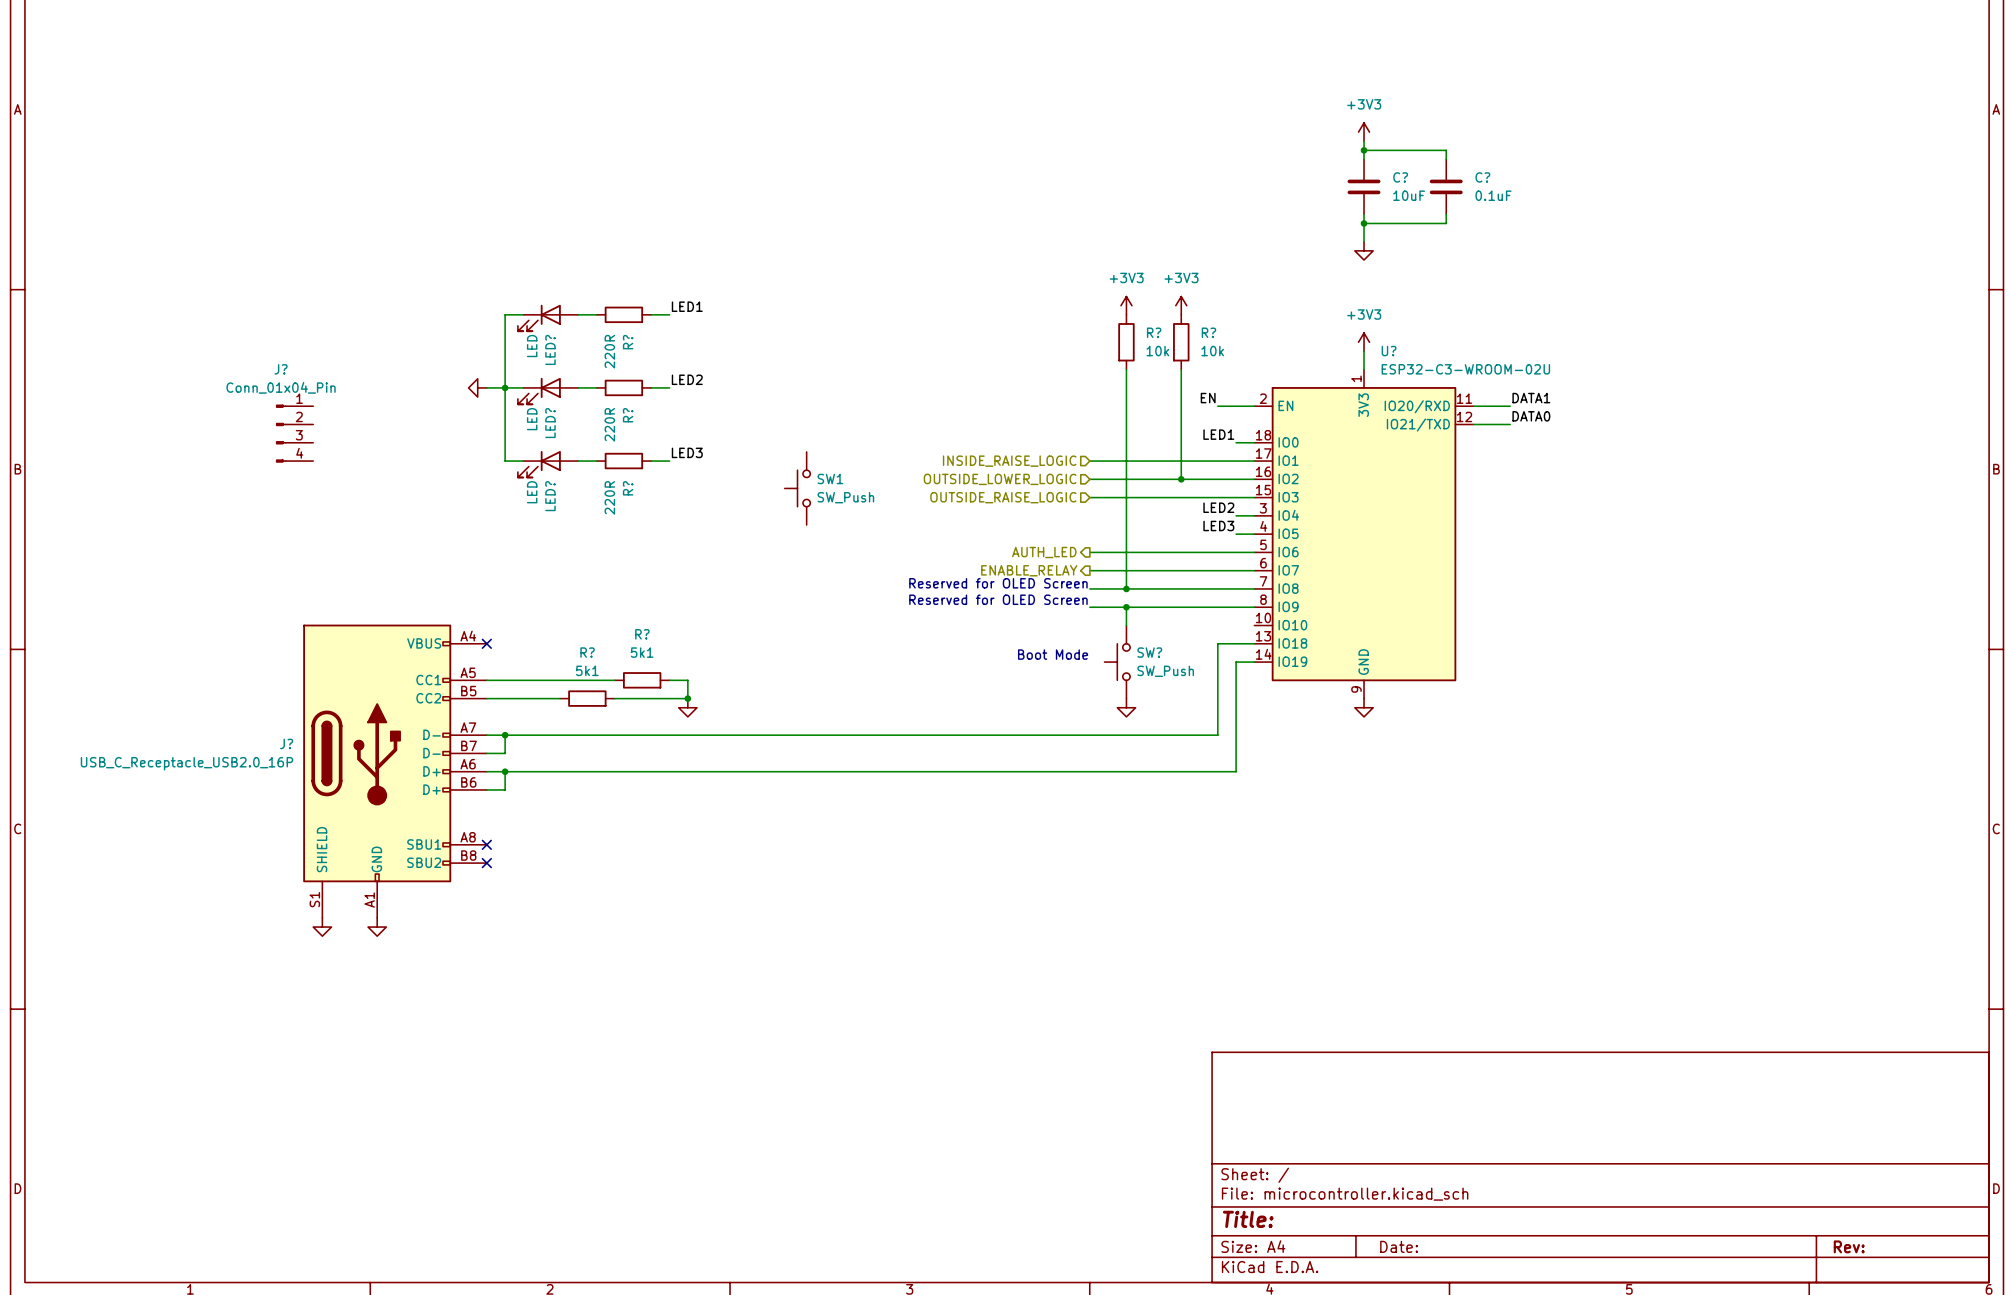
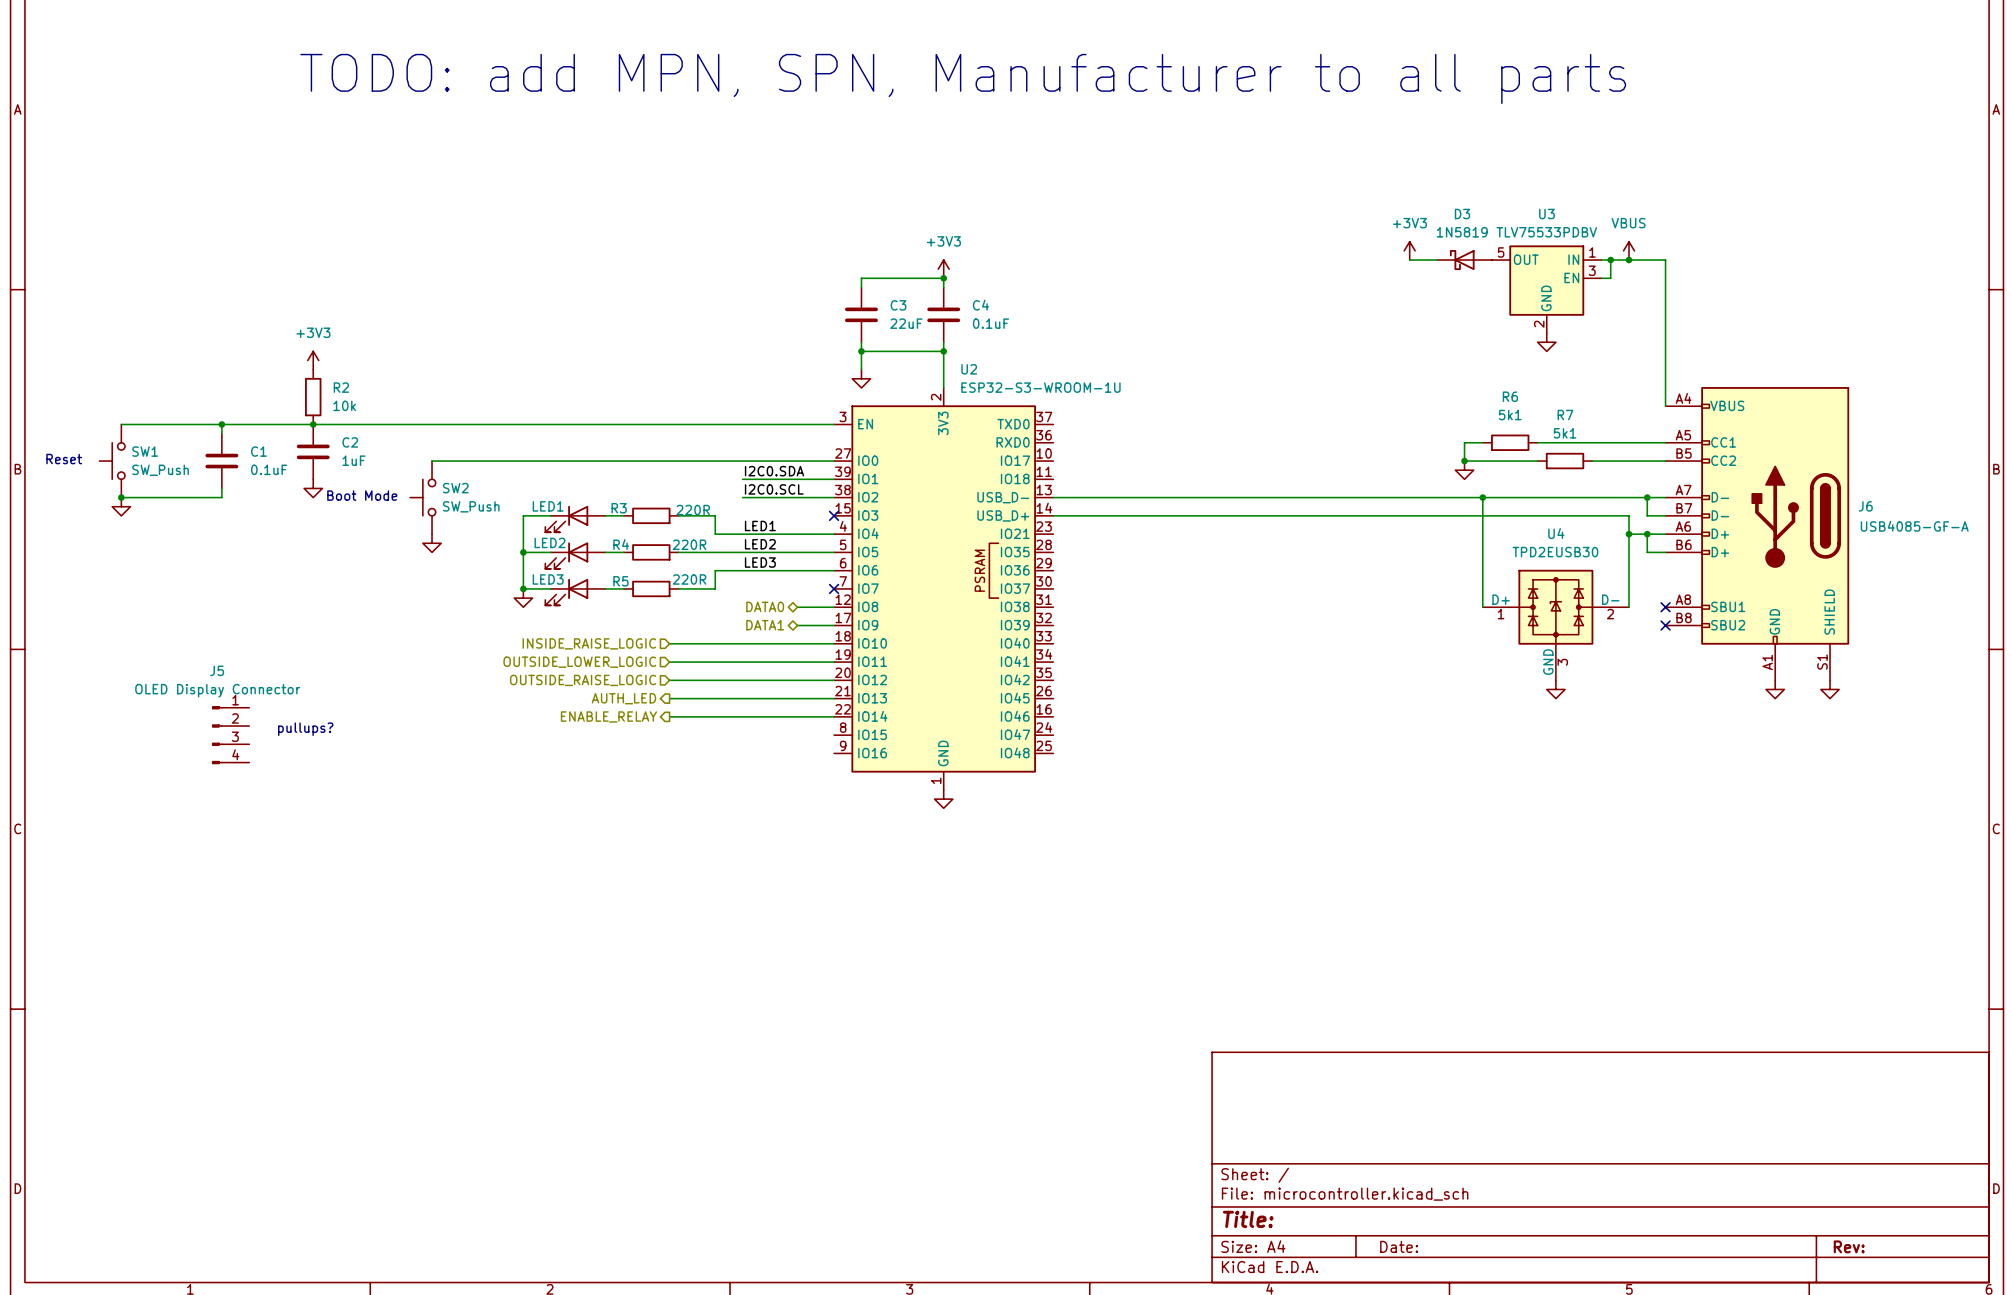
text: none -> TODO: add MPN, SPN, Manufacturer to all parts (963, 78)
power symbol: +3V3 (1364, 132) -> none
wire: (1364, 141) (1364, 159) -> none
wire: (1364, 150) (1446, 150) (1446, 159) -> none
junction: (1364, 150) -> none
C?: 10uF (1364, 186) -> none
C?: 0.1uF (1446, 186) -> none
wire: (1364, 214) (1364, 241) -> none
wire: (1446, 214) (1446, 223) (1364, 223) -> none
junction: (1364, 223) -> none
power symbol: (1364, 250) -> none
power symbol: none -> +3V3 (1409, 250)
power symbol: none -> VBUS (1628, 250)
wire: none -> (1409, 260) (1437, 260)
D3: none -> 1N5819 (1464, 260)
wire: none -> (1601, 260) (1665, 260) (1665, 406)
wire: none -> (1610, 260) (1610, 278) (1601, 278)
junction: none -> (1610, 260)
junction: none -> (1628, 260)
power symbol: none -> +3V3 (943, 269)
junction: none -> (943, 278)
wire: none -> (861, 287) (861, 278) (943, 278) (943, 287)
U3: none -> TLV75533PDBV (1546, 289)
power symbol: +3V3 (1126, 305) -> none
power symbol: +3V3 (1181, 305) -> none
label: LED1 (687, 306) -> none
wire: (523, 314) (505, 314) (505, 461) -> (432, 461) (505, 461)
wire: (578, 314) (596, 314) -> none
R?: 220R (623, 314) -> none
wire: (651, 314) (669, 314) -> none
C3: none -> 22uF (861, 314)
C4: none -> 0.1uF (943, 314)
LED?: LED (548, 318) -> none
wire: none -> (861, 342) (861, 369)
wire: none -> (943, 342) (943, 387)
R?: 10k (1126, 342) -> none
R?: 10k (1181, 342) -> none
power symbol: +3V3 (1364, 342) -> none
power symbol: none -> (1546, 342)
wire: none -> (861, 351) (943, 351)
junction: none -> (861, 351)
junction: none -> (943, 351)
wire: (1364, 351) (1364, 369) -> none
power symbol: none -> +3V3 (313, 360)
wire: (1126, 369) (1126, 588) -> none
wire: (1181, 369) (1181, 479) -> none
power symbol: none -> (861, 378)
label: LED2 (687, 379) -> none
power symbol: (477, 387) -> none
wire: (486, 387) (523, 387) -> none
junction: (505, 387) -> none
wire: (578, 387) (596, 387) -> (605, 515) (623, 515)
R?: 220R (623, 387) -> none
wire: (651, 387) (669, 387) -> (605, 552) (623, 552)
LED?: LED (548, 391) -> none
R2: none -> 10k (313, 397)
label: EN (1208, 398) -> none
label: DATA1 (1531, 398) -> none
wire: (1217, 406) (1254, 406) -> none
wire: (1473, 406) (1510, 406) -> none
label: DATA0 (1531, 416) -> none
wire: none -> (121, 424) (834, 424)
wire: none -> (221, 424) (221, 433)
junction: none -> (221, 424)
junction: none -> (313, 424)
wire: (1473, 424) (1510, 424) -> none
J?: Conn_01x04_Pin (294, 433) -> none
label: LED1 (1218, 434) -> none
wire: (1236, 442) (1254, 442) -> none
wire: none -> (1482, 442) (1464, 442) (1464, 461) (1537, 461)
R6: none -> 5k1 (1510, 442)
wire: none -> (1537, 442) (1665, 442)
C2: none -> 1uF (313, 451)
label position: LED3 (687, 452) -> LED3 (760, 562)
text: none -> Reset (64, 459)
C1: none -> 0.1uF (221, 461)
wire: none -> (596, 461) (651, 461)
R?: 220R (623, 461) -> none
wire: none -> (669, 461) (834, 461)
hierarchical label: INSIDE_RAISE_LOGIC (1009, 461) -> none
wire: (1089, 461) (1254, 461) -> none
junction: none -> (1464, 461)
R7: none -> 5k1 (1565, 461)
wire: none -> (1592, 461) (1665, 461)
LED?: LED (548, 464) -> none
power symbol: none -> (1464, 470)
label: none -> I2C0.SDA (774, 471)
wire: none -> (742, 479) (834, 479)
hierarchical label: OUTSIDE_LOWER_LOGIC (1000, 479) -> none
wire: (1089, 479) (1254, 479) -> none
junction: (1181, 479) -> none
wire: none -> (221, 488) (221, 497) (121, 497)
power symbol: none -> (313, 488)
SW1 position: (797, 488) -> (112, 461)
label: none -> I2C0.SCL (774, 489)
text: none -> Boot Mode (362, 495)
junction: none -> (121, 497)
SW2: none -> SW_Push (422, 497)
wire: none -> (742, 497) (834, 497)
hierarchical label: OUTSIDE_RAISE_LOGIC (1003, 497) -> none
wire: none -> (1053, 497) (1089, 497)
wire: none -> (1254, 497) (1665, 497)
wire: none -> (1482, 497) (1482, 607)
junction: none -> (1482, 497)
wire: none -> (1647, 497) (1647, 515) (1665, 515)
junction: none -> (1647, 497)
power symbol: none -> (121, 506)
label: LED2 (1218, 507) -> none
wire: none -> (550, 515) (523, 515) (523, 588) (550, 588)
R3: none -> 220R (651, 515)
wire: none -> (678, 515) (715, 515) (715, 534) (834, 534)
no-connect mark: none -> (834, 515)
wire: none -> (1053, 515) (1236, 515)
wire: none -> (1254, 515) (1628, 515) (1628, 607)
LED1: none -> (575, 519)
label: none -> LED1 (760, 525)
label: LED3 (1218, 525) -> none
J6: none -> (1757, 533)
wire: (1236, 534) (1254, 534) -> none
U?: ESP32-C3-WROOM-02U (1364, 534) -> none
wire: none -> (1628, 534) (1665, 534)
junction: none -> (1628, 534)
wire: none -> (1647, 534) (1647, 552) (1665, 552)
junction: none -> (1647, 534)
power symbol: none -> (432, 543)
label: none -> LED2 (760, 544)
wire: none -> (523, 552) (550, 552)
junction: none -> (523, 552)
R4: none -> 220R (651, 552)
wire: none -> (678, 552) (834, 552)
hierarchical label: AUTH_LED (1044, 552) -> none
wire: (1089, 552) (1254, 552) -> none
LED2: none -> (575, 555)
wire: none -> (834, 570) (715, 570) (715, 588) (678, 588)
hierarchical label: ENABLE_RELAY (1029, 570) -> none
wire: (1089, 570) (1254, 570) -> none
text: Reserved for OLED Screen (998, 583) -> none
junction: none -> (523, 588)
wire: none -> (605, 588) (623, 588)
R5: none -> 220R (651, 588)
no-connect mark: none -> (834, 588)
U2: none -> ESP32-S3-WROOM-1U (943, 588)
wire: (1089, 588) (1254, 588) -> none
junction: (1126, 588) -> none
LED3: none -> (575, 592)
power symbol: none -> (523, 598)
text: Reserved for OLED Screen (998, 599) -> none
hierarchical label: none -> DATA0 (765, 606)
wire: none -> (797, 607) (834, 607)
wire: (1089, 607) (1254, 607) -> none
wire: (1126, 607) (1126, 625) -> none
junction: (1126, 607) -> none
no-connect mark: none -> (1665, 607)
hierarchical label: none -> DATA1 (765, 625)
wire: none -> (797, 625) (834, 625)
U4: none -> TPD2EUSB30 (1555, 625)
no-connect mark: none -> (1665, 625)
no-connect mark: (486, 643) -> none
hierarchical label: none -> INSIDE_RAISE_LOGIC (589, 643)
wire: none -> (669, 643) (834, 643)
wire: (1254, 643) (1217, 643) (1217, 735) (486, 735) -> none
text: Boot Mode (1053, 654) -> none
hierarchical label: none -> OUTSIDE_LOWER_LOGIC (579, 662)
wire: none -> (669, 662) (834, 662)
SW?: SW_Push (1117, 662) -> none
wire: (1254, 662) (1236, 662) (1236, 771) (486, 771) -> none
wire: (486, 680) (614, 680) -> none
hierarchical label: none -> OUTSIDE_RAISE_LOGIC (583, 680)
R?: 5k1 (642, 680) -> none
wire: (687, 680) (687, 698) -> (687, 680) (834, 680)
power symbol: none -> (1555, 689)
power symbol: none -> (1775, 689)
power symbol: none -> (1830, 689)
wire: (486, 698) (559, 698) -> none
R?: 5k1 (587, 698) -> none
wire: (614, 698) (669, 698) -> none
hierarchical label: none -> AUTH_LED (623, 698)
wire: none -> (687, 698) (834, 698)
junction: (687, 698) -> none
power symbol: (687, 707) -> none
power symbol: (1126, 707) -> none
power symbol: (1364, 707) -> none
hierarchical label: none -> ENABLE_RELAY (608, 716)
wire: none -> (669, 716) (834, 716)
text: none -> pullups? (305, 729)
J5: none -> OLED Display Connector (230, 735)
wire: (505, 735) (505, 753) (486, 753) -> none
junction: (505, 735) -> none
J?: USB_C_Receptacle_USB2.0_16P (395, 771) -> none
wire: (505, 771) (505, 789) (486, 789) -> none
junction: (505, 771) -> none
power symbol: none -> (943, 799)
no-connect mark: (486, 844) -> none
no-connect mark: (486, 863) -> none
power symbol: (322, 927) -> none
power symbol: (377, 927) -> none

